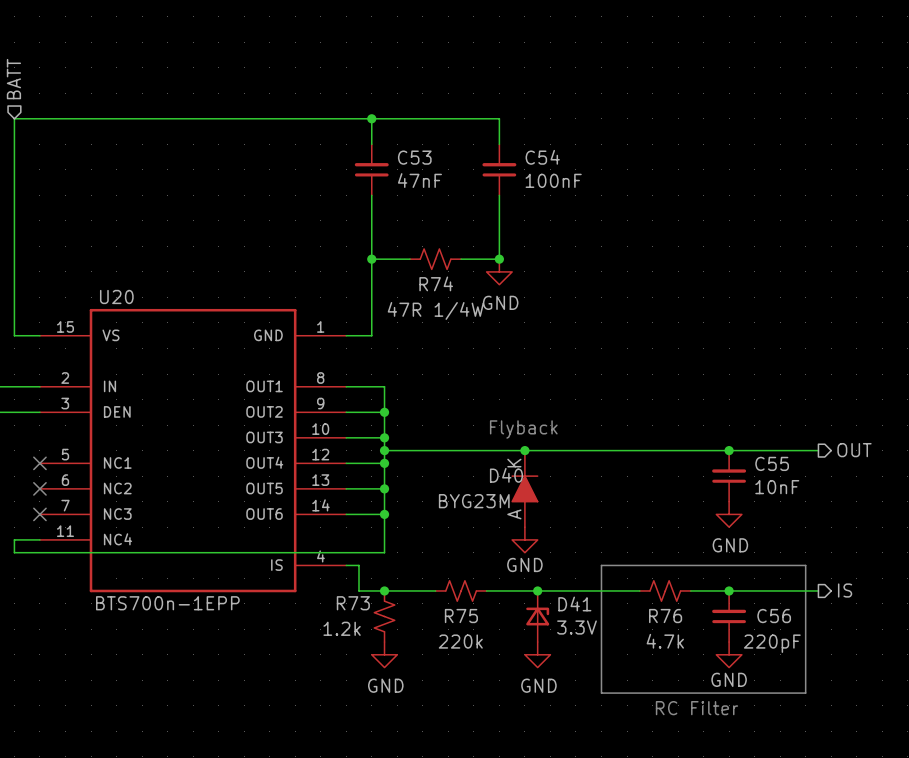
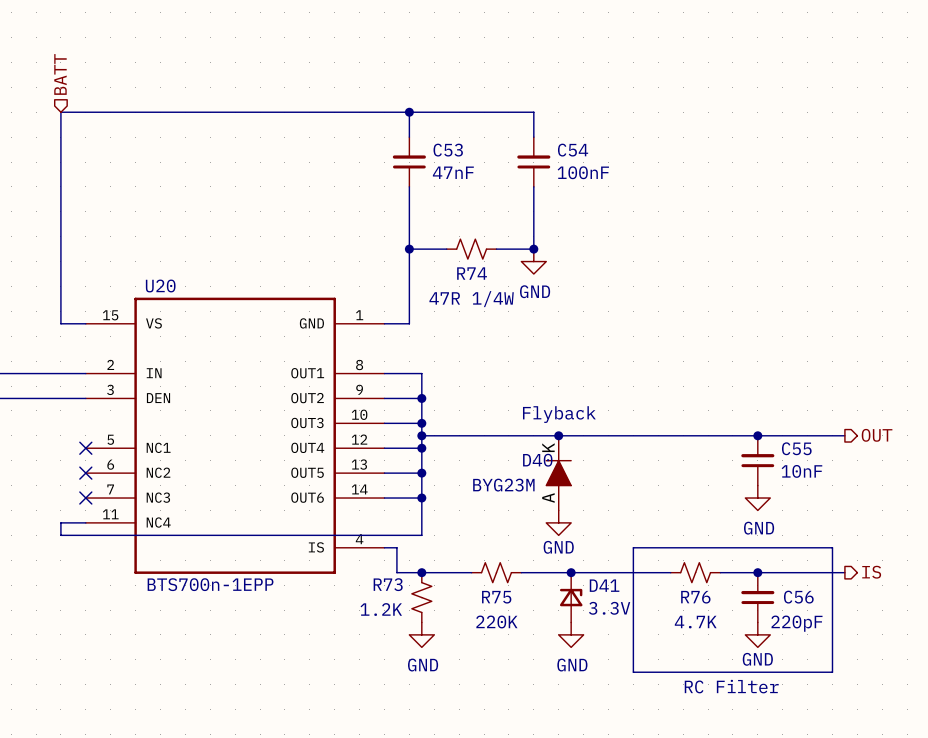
R73 value: 1.2k (342, 628) -> 1.2K (381, 609)
R75 value: 220k (460, 641) -> 220K (496, 621)
R76 value: 4.7k (665, 641) -> 4.7K (695, 622)

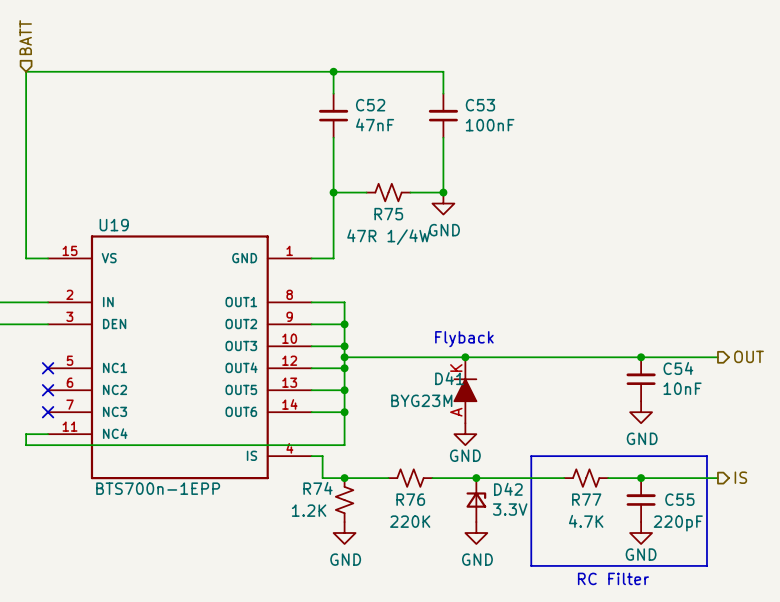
C53 name: C53 (448, 150) -> C52 (370, 105)
C54 name: C54 (573, 150) -> C53 (480, 105)
R74 name: R74 (472, 273) -> R75 (388, 214)
U20 name: U20 (160, 285) -> U19 (114, 225)
C55 name: C55 (796, 448) -> C54 (678, 368)
D40 name: D40 (537, 460) -> D41 (449, 378)
R73 name: R73 (388, 584) -> R74 (317, 488)
D41 name: D41 (604, 585) -> D42 (508, 489)
R75 name: R75 (496, 597) -> R76 (410, 499)
R76 name: R76 (695, 597) -> R77 (586, 499)
C56 name: C56 (798, 597) -> C55 (679, 499)

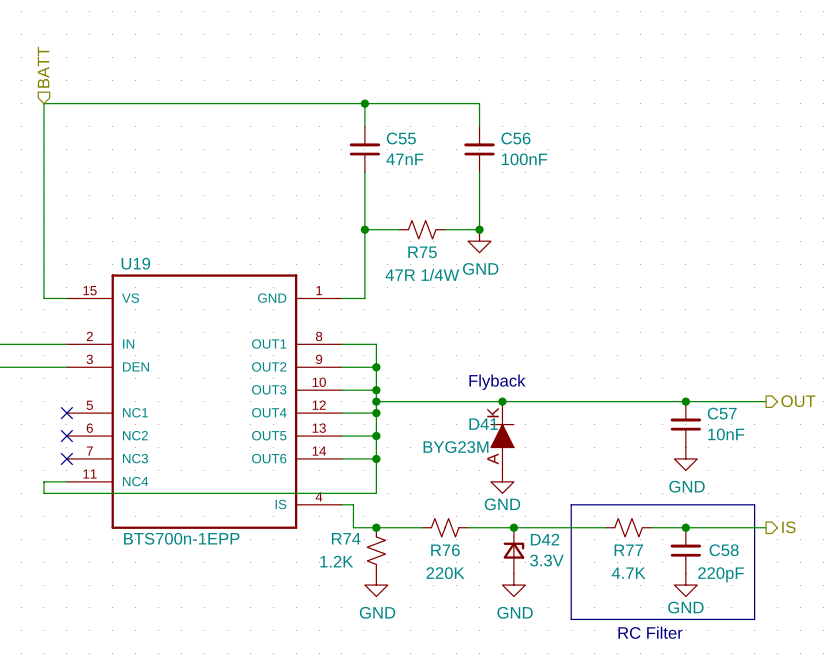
C52 name: C52 (370, 105) -> C55 (401, 138)
C53 name: C53 (480, 105) -> C56 (515, 138)
C54 name: C54 (678, 368) -> C57 (722, 413)
C55 name: C55 (679, 499) -> C58 (724, 550)

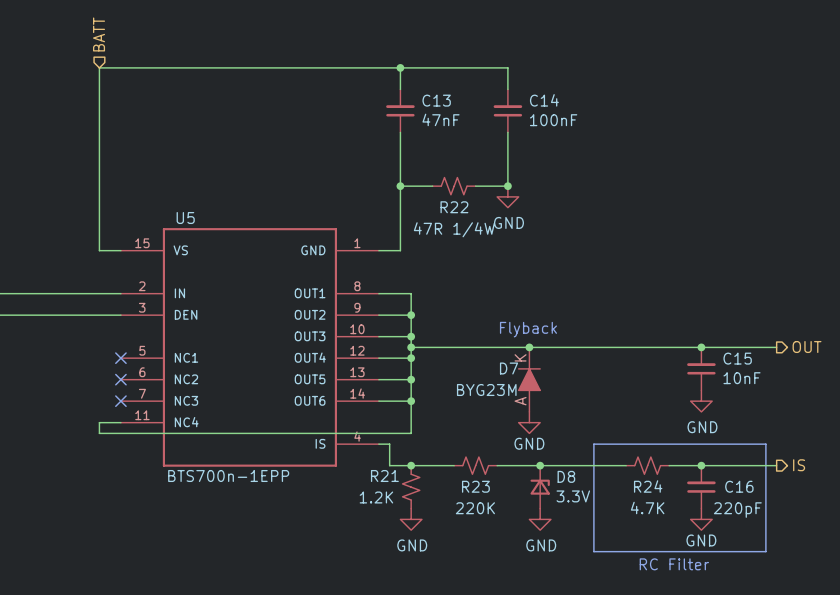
C55 name: C55 (401, 138) -> C13 (436, 100)
C56 name: C56 (515, 138) -> C14 (544, 100)
R75 name: R75 (422, 252) -> R22 (454, 207)
U19 name: U19 (135, 263) -> U5 (185, 218)
C57 name: C57 (722, 413) -> C15 (737, 358)
D41 name: D41 (483, 424) -> D7 (509, 368)
R74 name: R74 (346, 538) -> R21 (384, 476)
D42 name: D42 (545, 539) -> D8 (566, 476)
R76 name: R76 (445, 550) -> R23 (475, 486)
R77 name: R77 (628, 550) -> R24 (648, 486)
C58 name: C58 (724, 550) -> C16 (739, 486)

